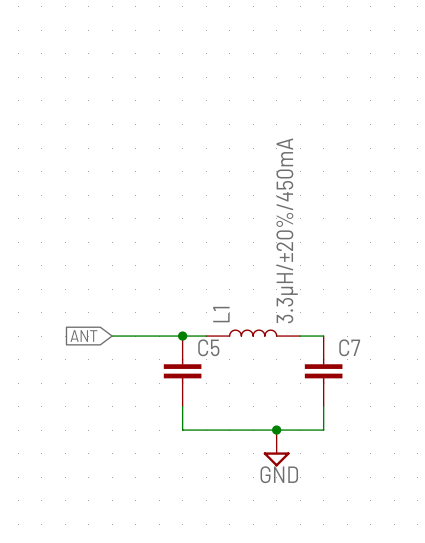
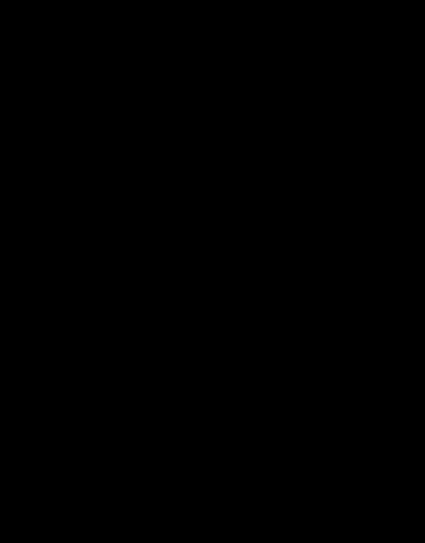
L1: 3.3µH/±20%/450mA (253, 333) -> none
global label: ANT (83, 336) -> none
wire: (112, 336) (206, 336) -> none
junction: (182, 336) -> none
wire: (300, 336) (323, 336) -> none
C5: (182, 371) -> none
C7: (323, 371) -> none
wire: (182, 406) (182, 430) (323, 430) (323, 406) -> none
junction: (276, 430) -> none
power symbol: GND (276, 448) -> none

